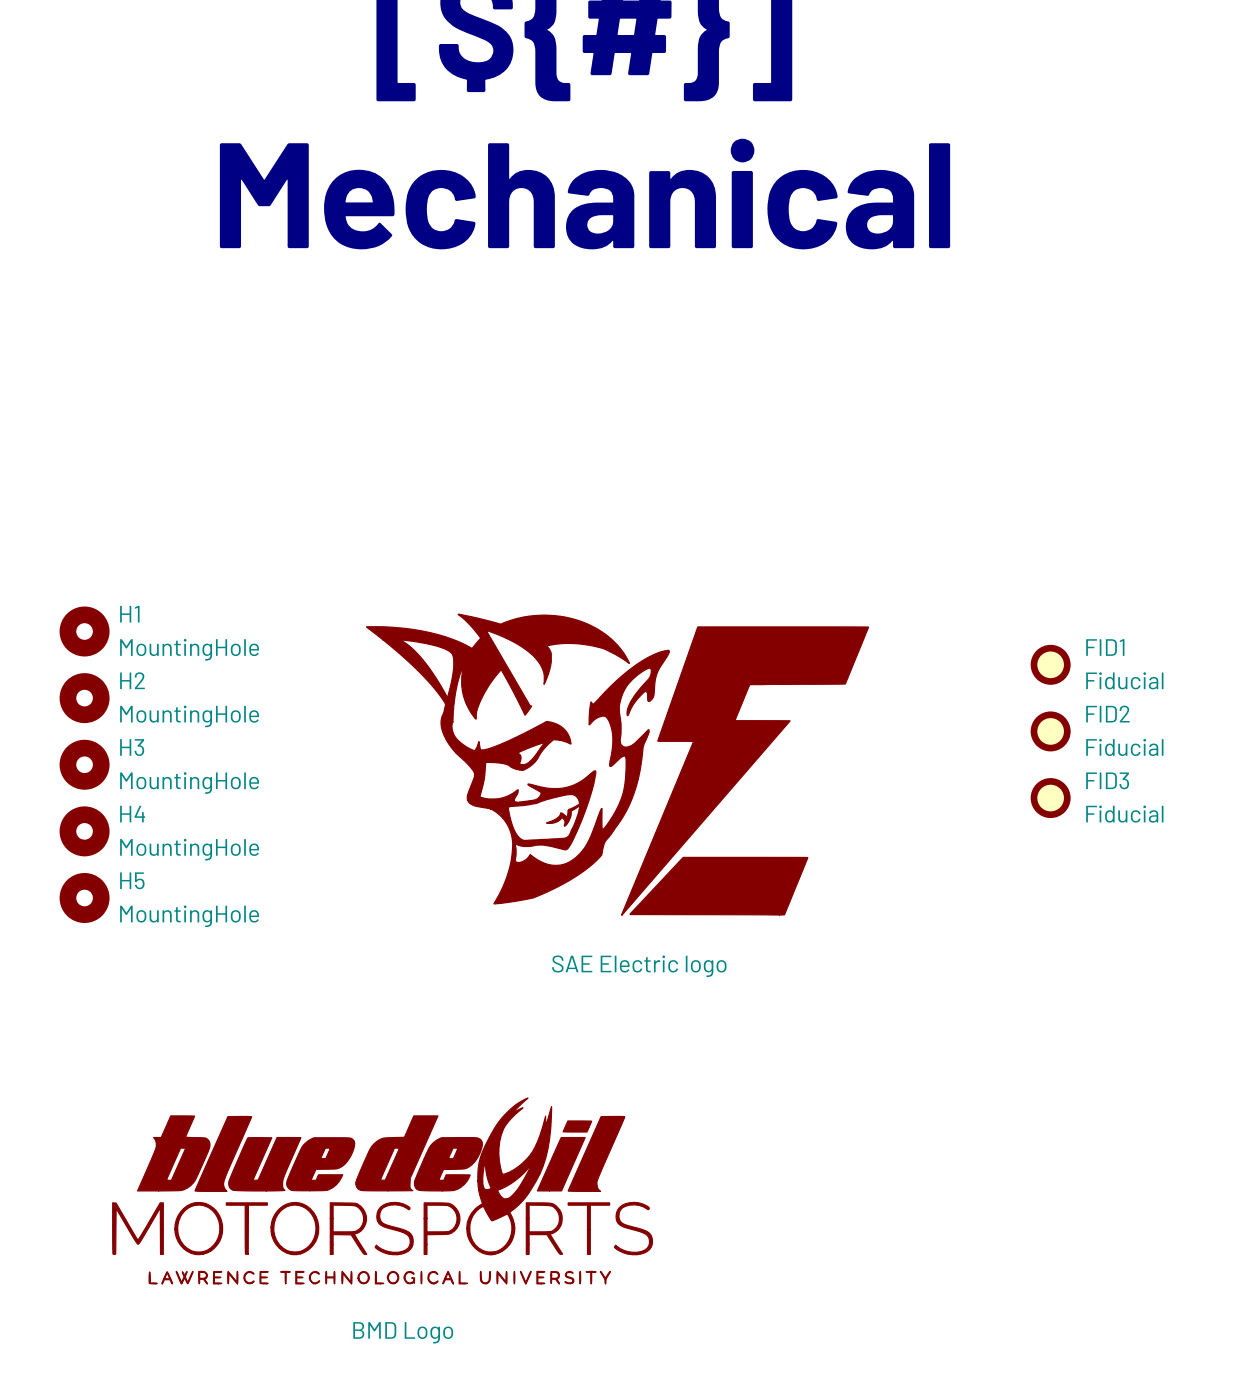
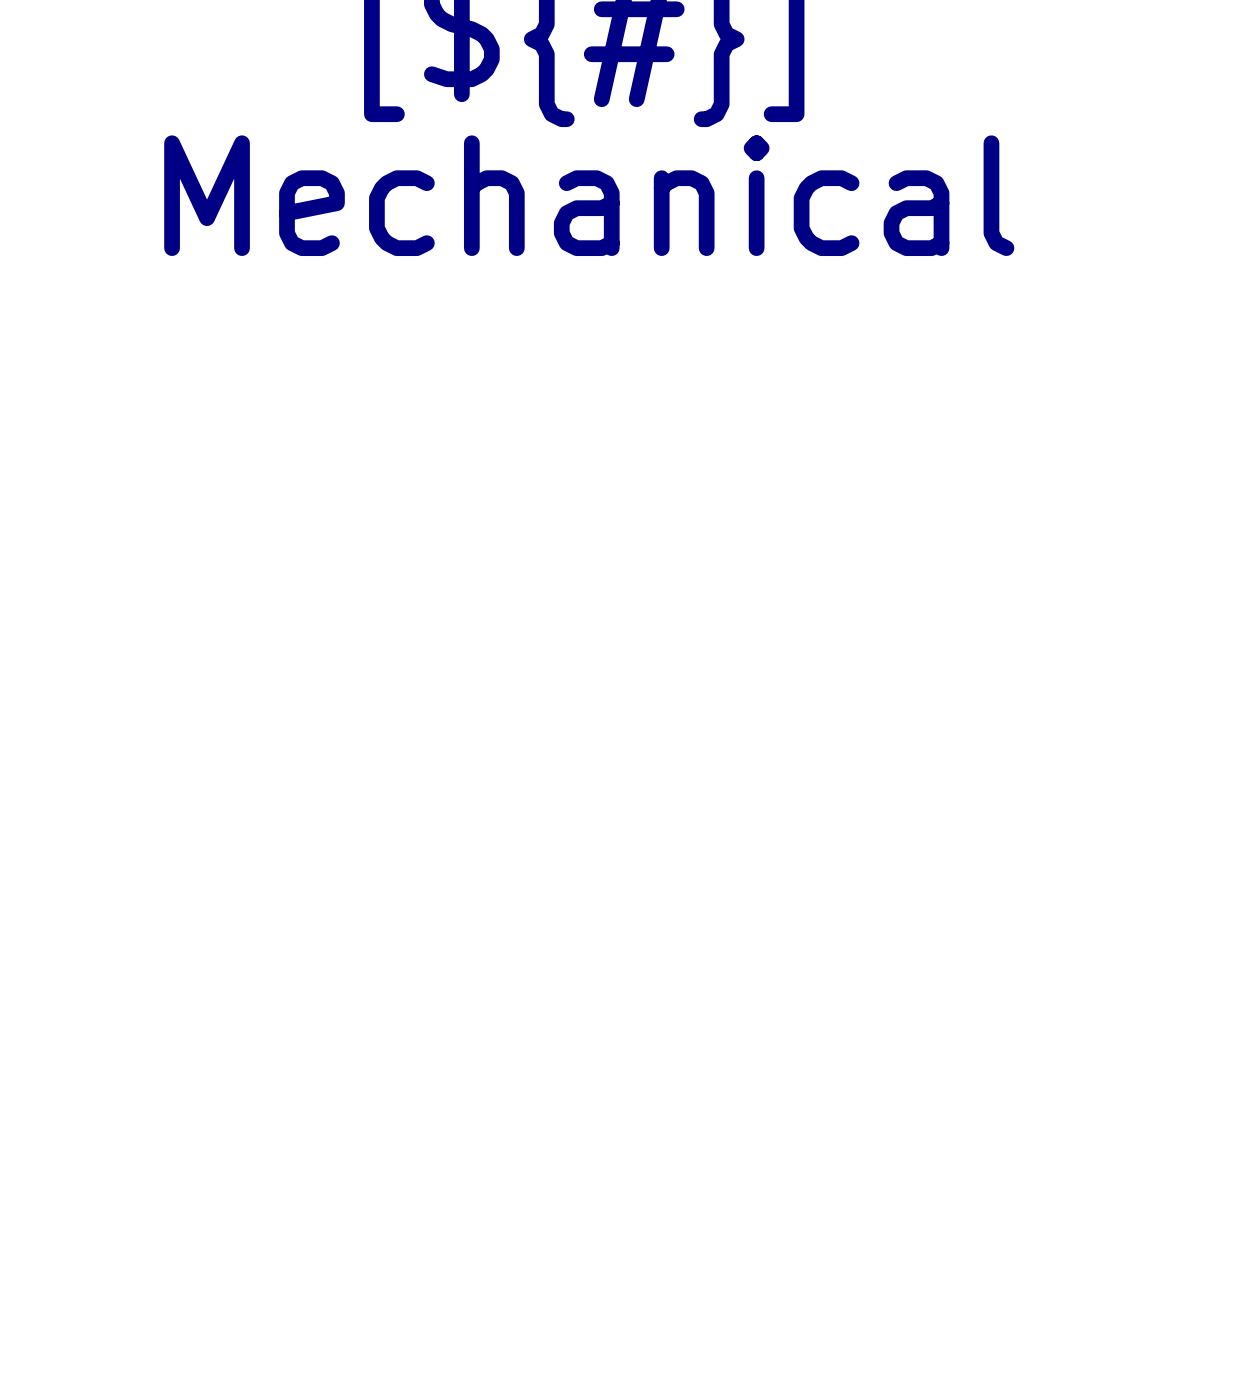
H1: MountingHole (84, 631) -> none
FID1: Fiducial (1050, 664) -> none
H2: MountingHole (84, 698) -> none
FID2: Fiducial (1050, 731) -> none
H3: MountingHole (84, 764) -> none
part: SAE Electric logo (617, 764) -> none
FID3: Fiducial (1050, 798) -> none
H4: MountingHole (84, 831) -> none
H5: MountingHole (84, 898) -> none
part: BMD Logo (382, 1190) -> none

